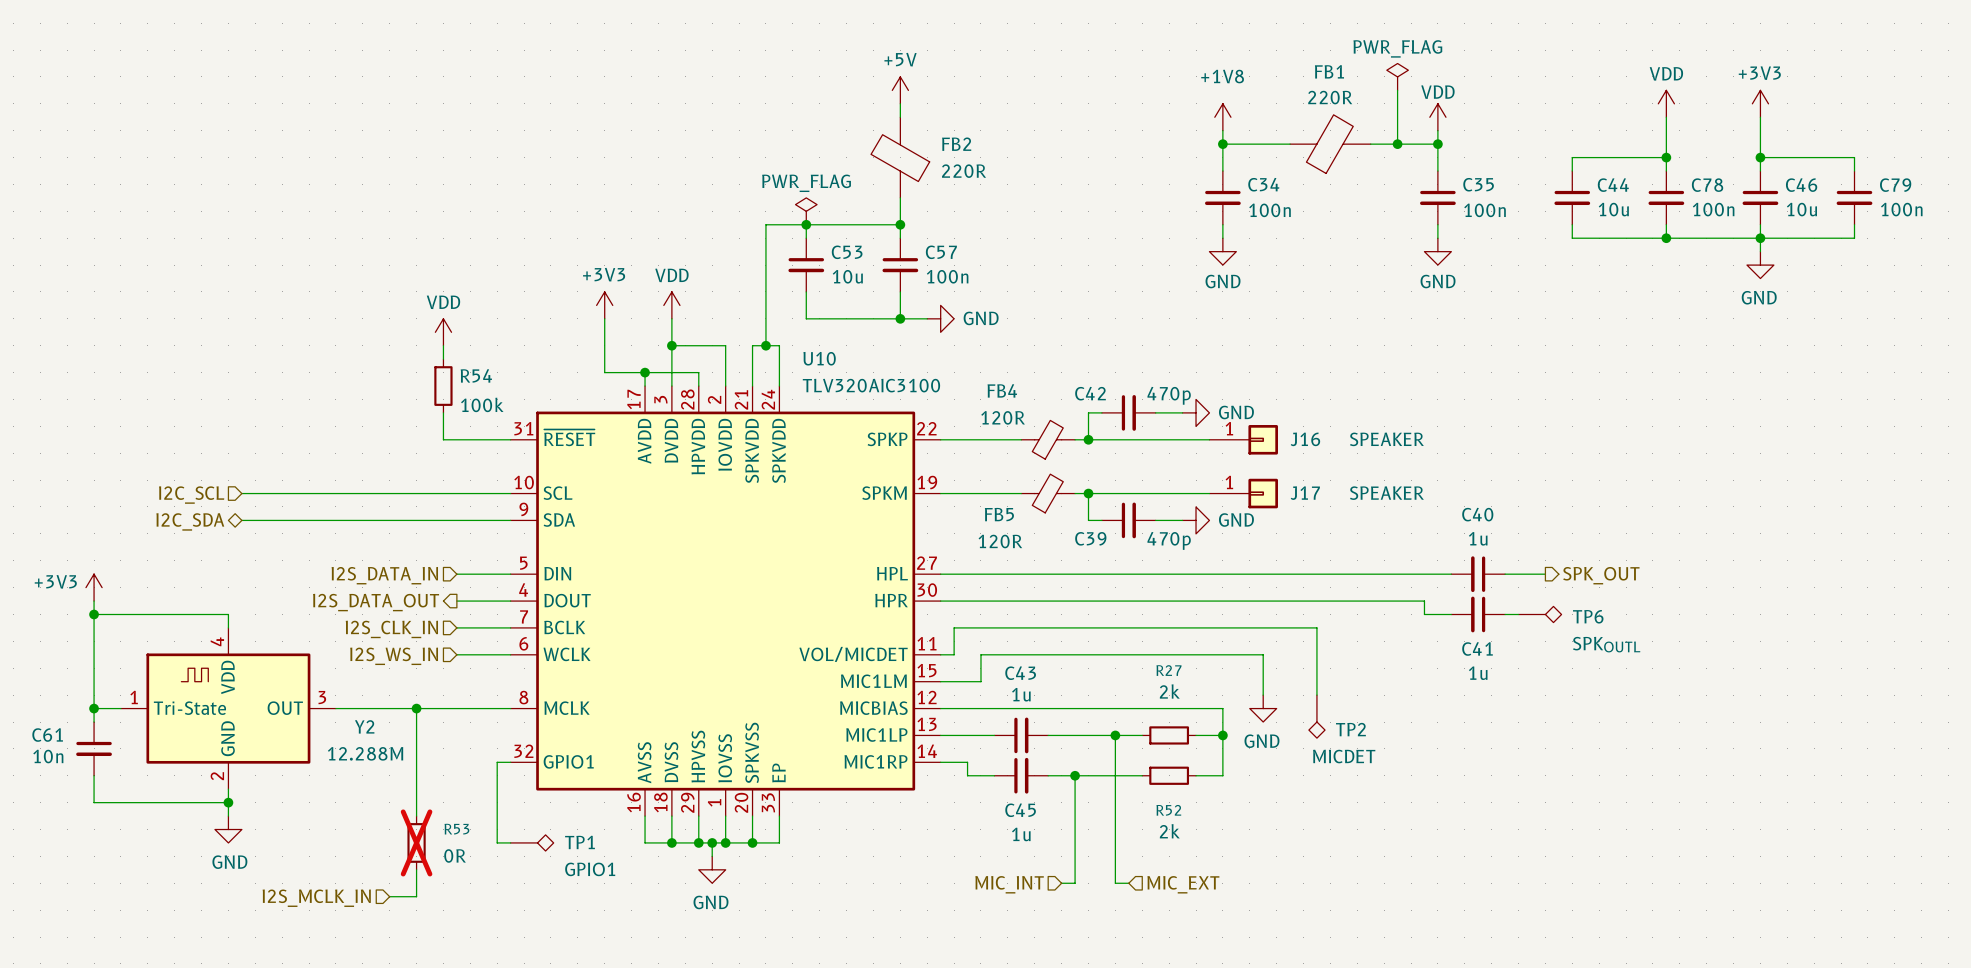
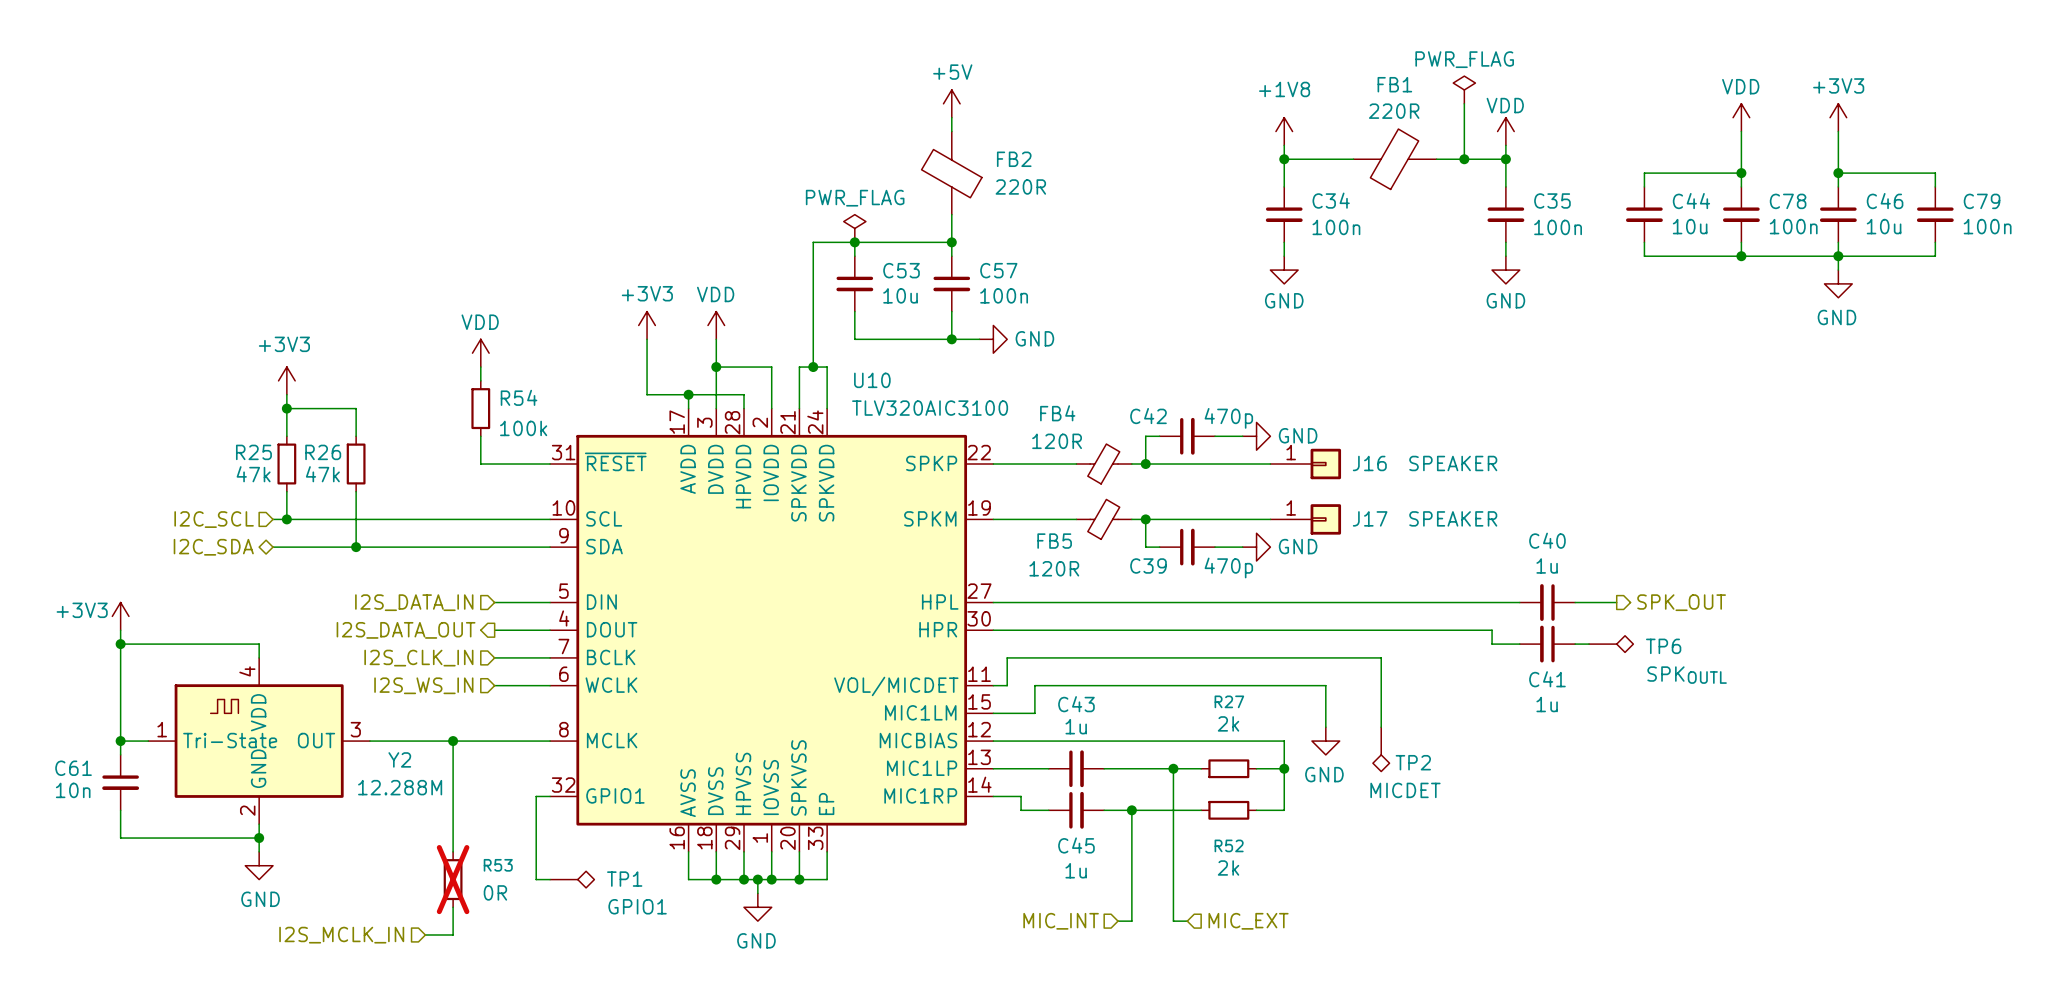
power symbol: none -> +3V3 (286, 380)
wire: none -> (286, 394) (286, 436)
wire: none -> (286, 408) (356, 408) (356, 436)
junction: none -> (286, 408)
R25: none -> 47k (286, 464)
R26: none -> 47k (356, 464)
wire: none -> (286, 491) (286, 519)
wire: none -> (356, 491) (356, 547)
junction: none -> (286, 519)
junction: none -> (356, 547)

